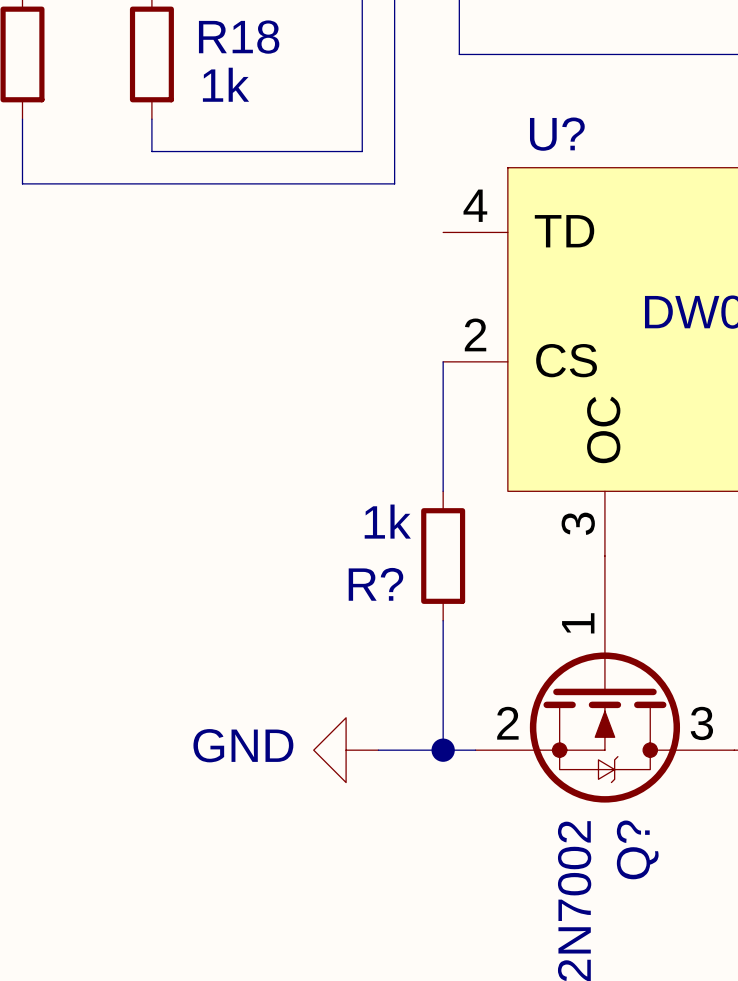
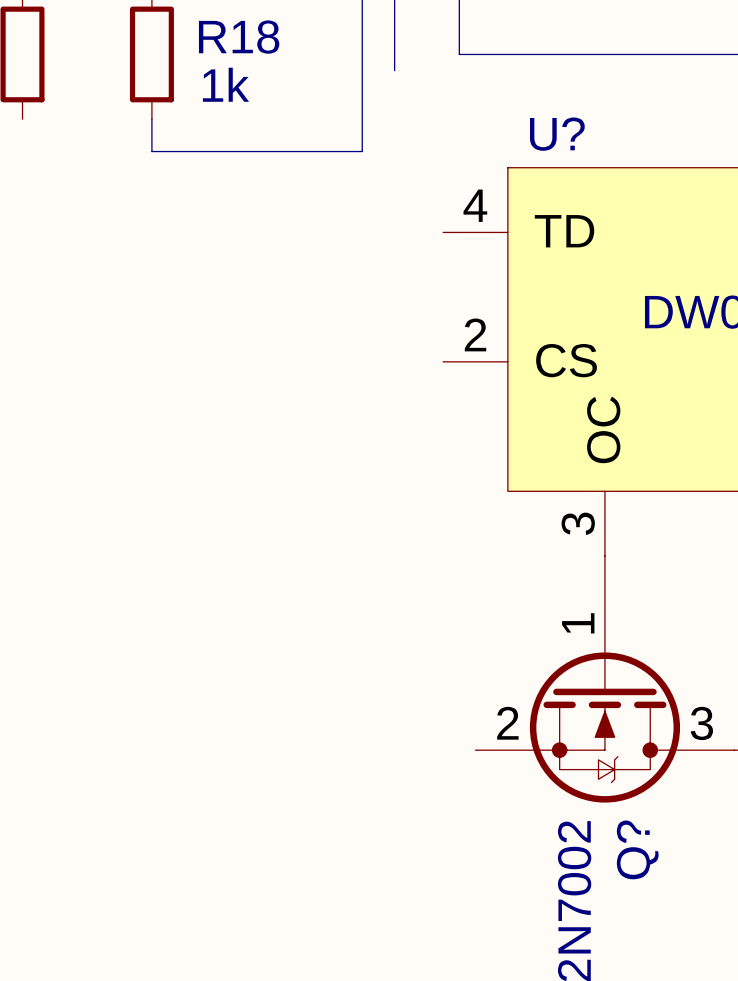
wire: (394, 70) (394, 183) (22, 183) (22, 119) -> none
wire: (443, 361) (443, 491) -> none
R?: 1k (443, 556) -> none
wire: (443, 620) (443, 750) -> none
power symbol: GND (346, 750) -> none
wire: (378, 750) (475, 750) -> none
junction: (443, 750) -> none

